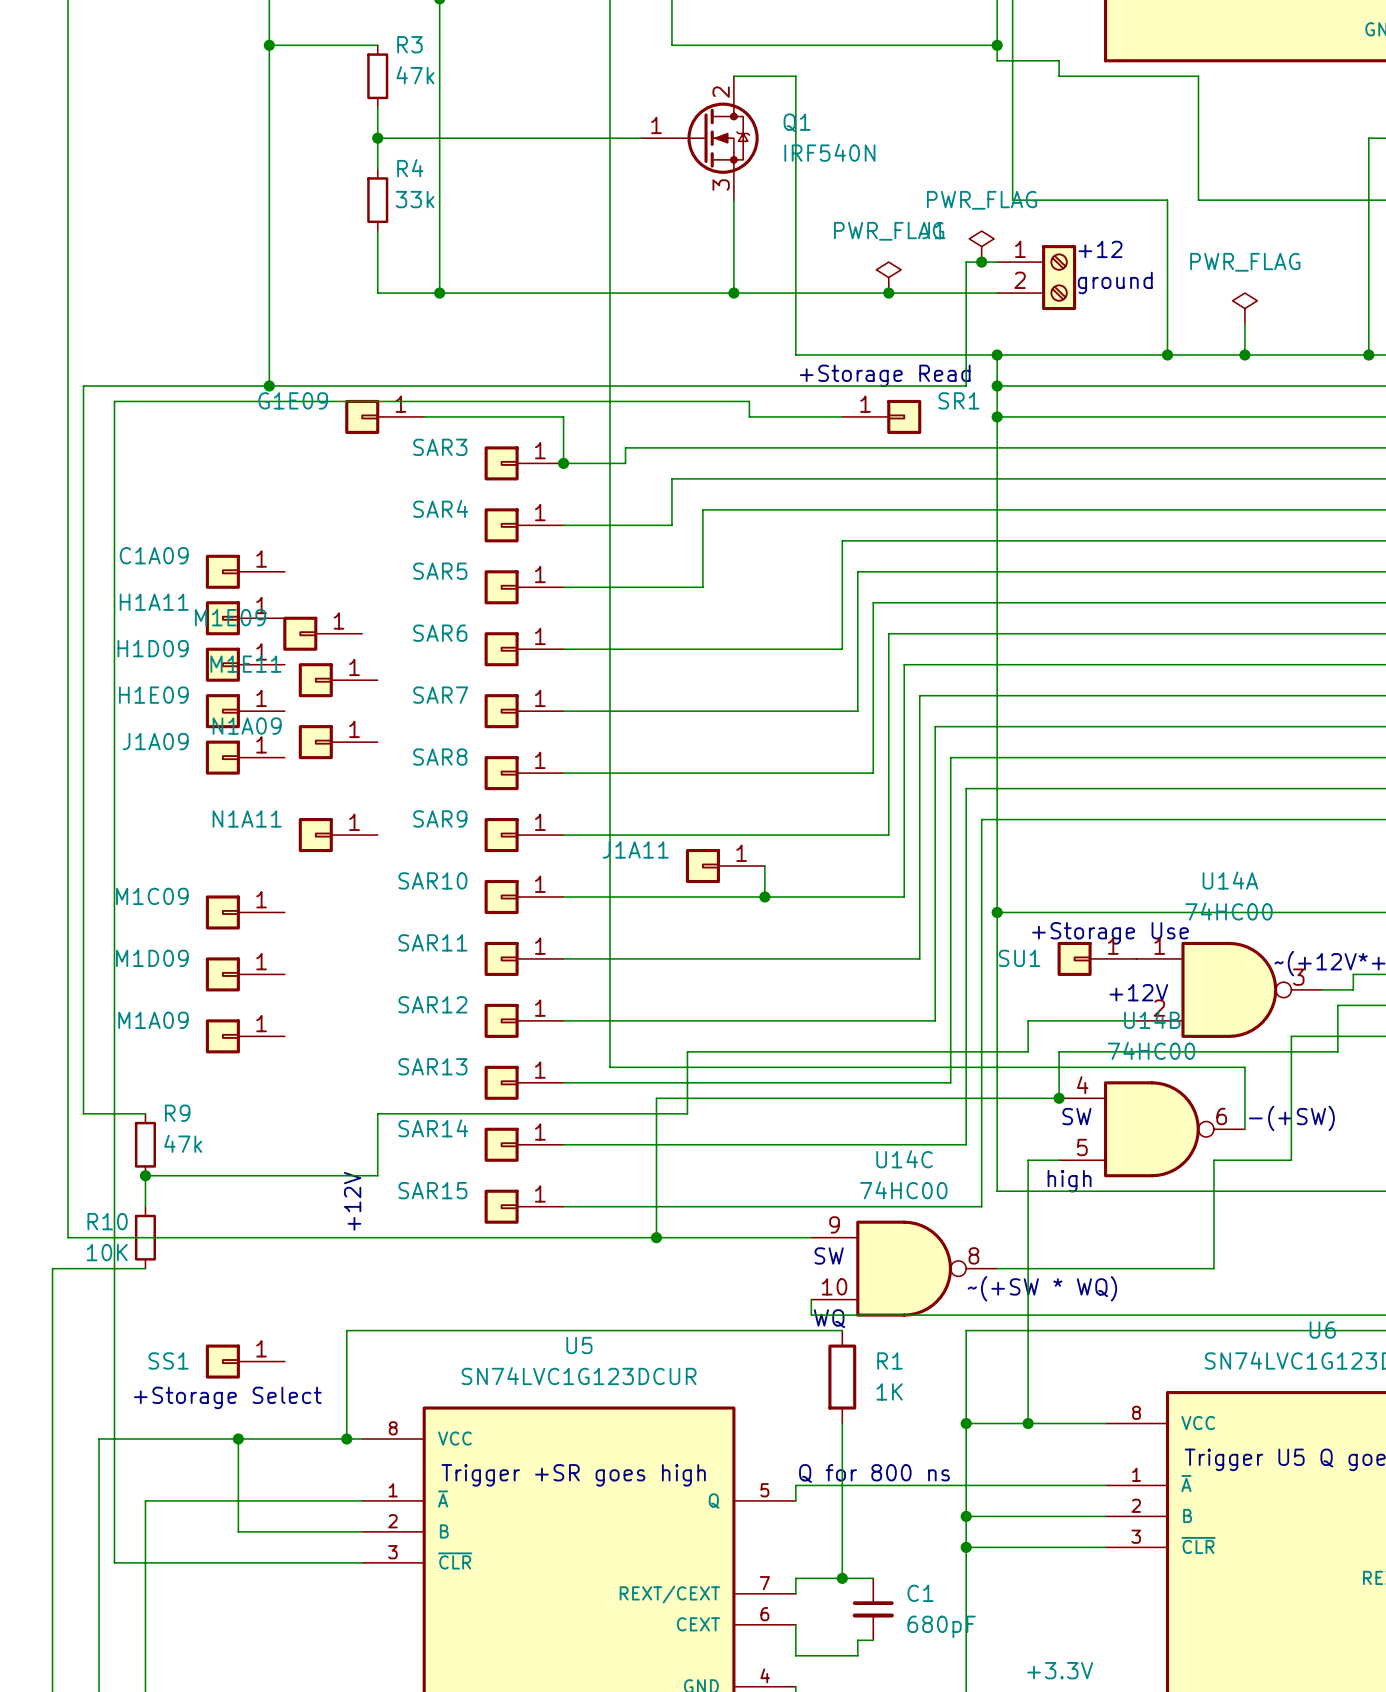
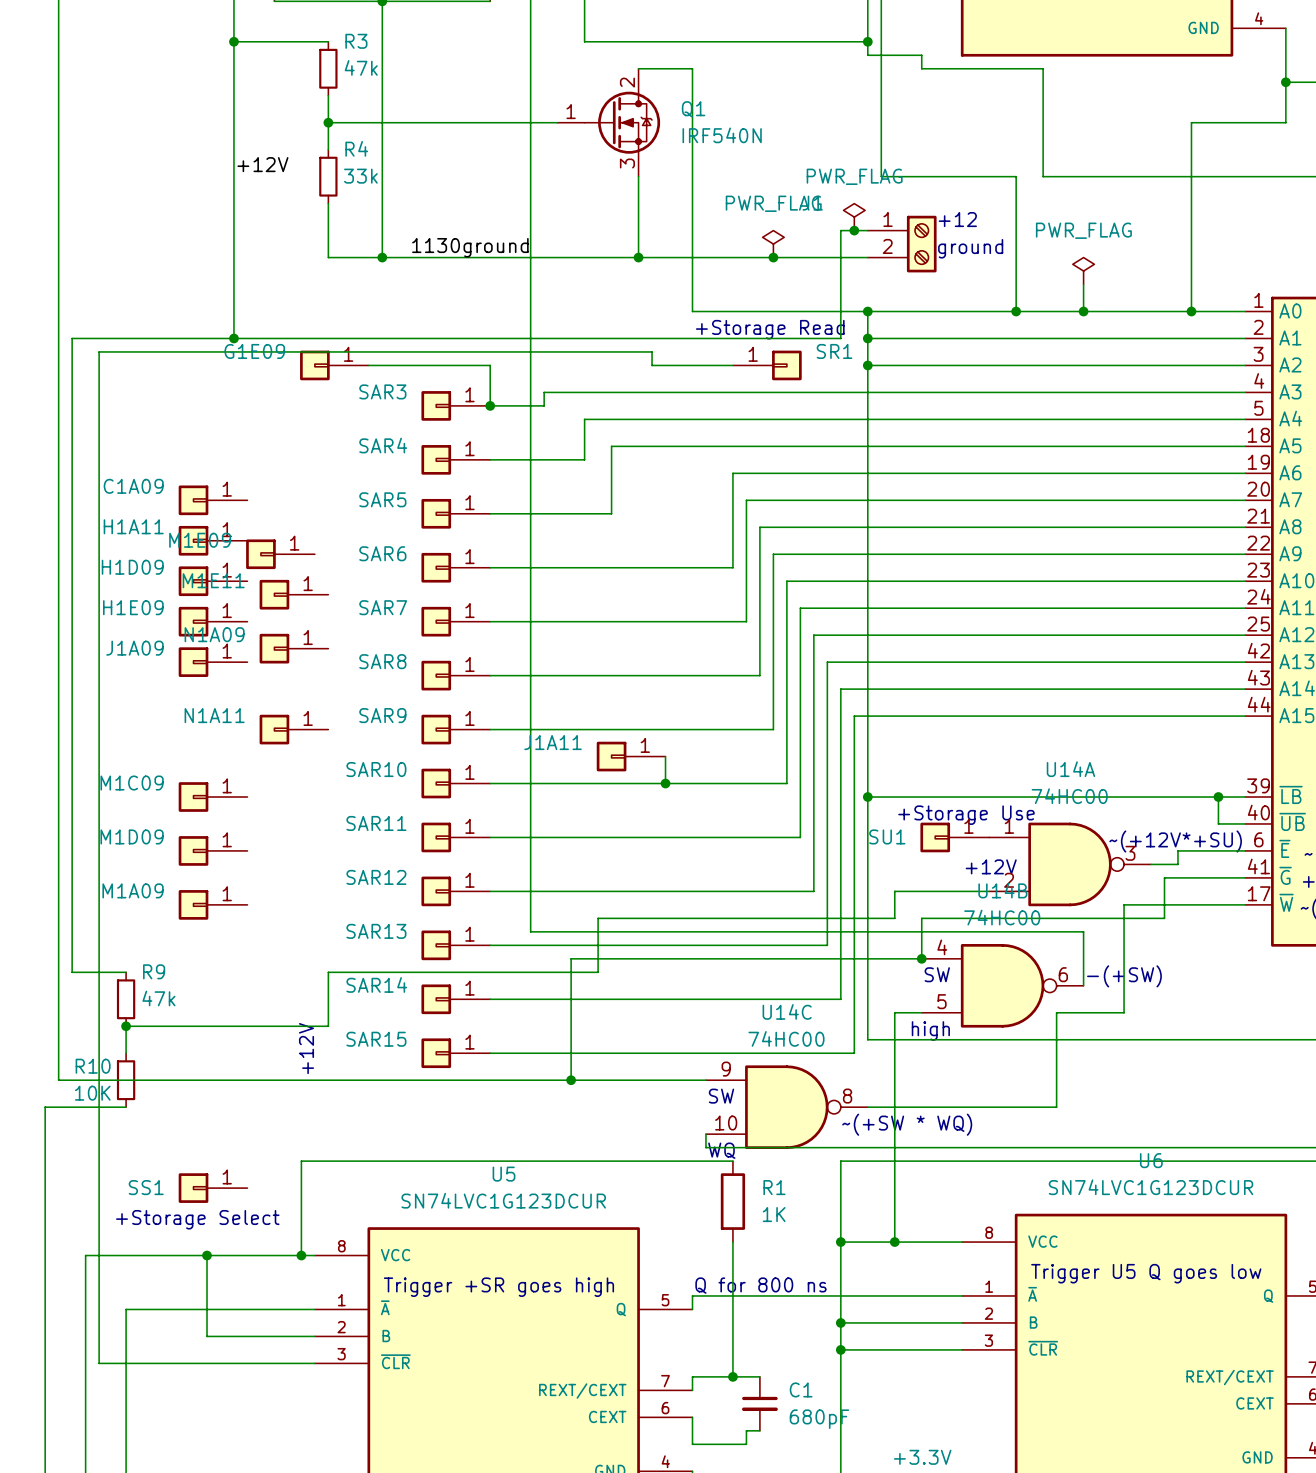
label: none -> +12V (262, 164)
label: none -> 1130ground (470, 247)

